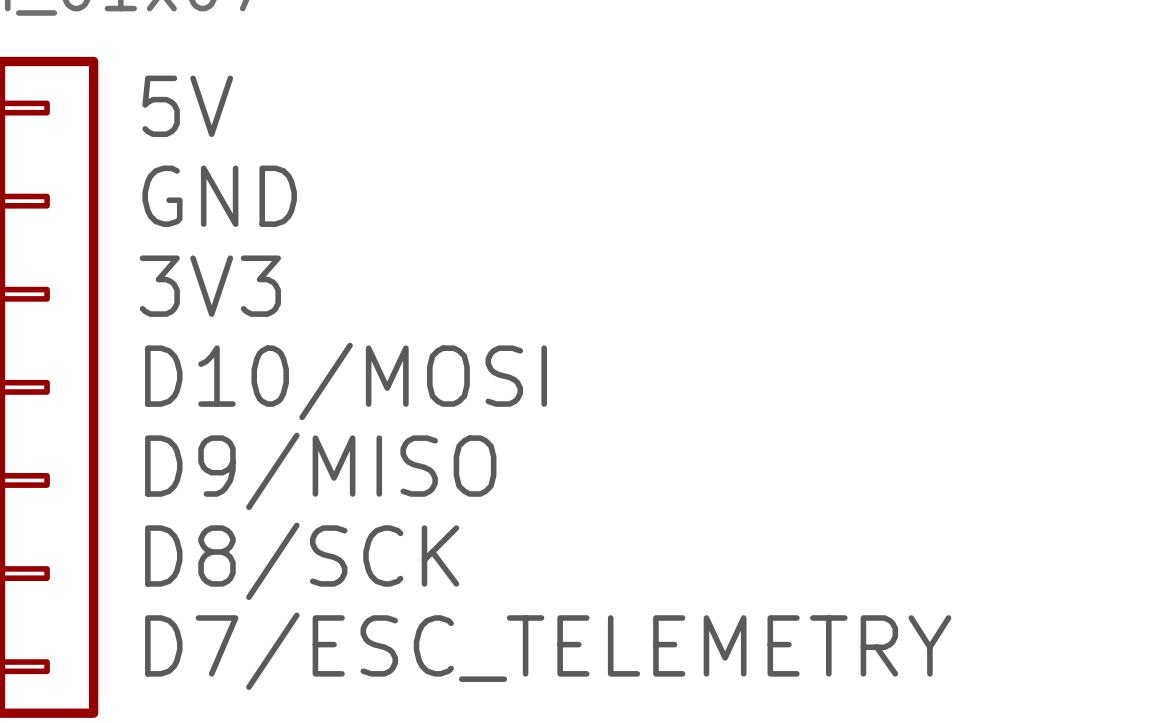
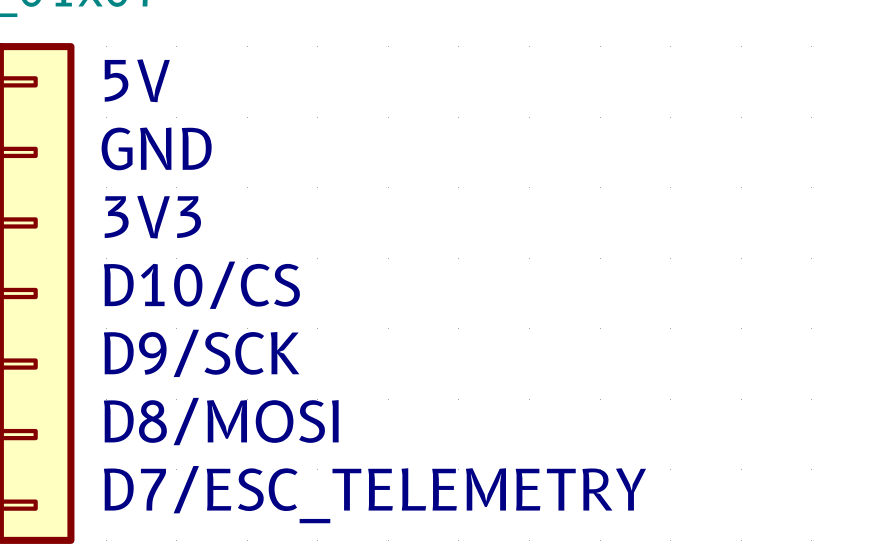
text: D10/MOSI (346, 381) -> D10/CS (201, 285)
text: D9/MISO (320, 471) -> D9/SCK (201, 353)
text: D8/SCK (302, 561) -> D8/MOSI (221, 421)

